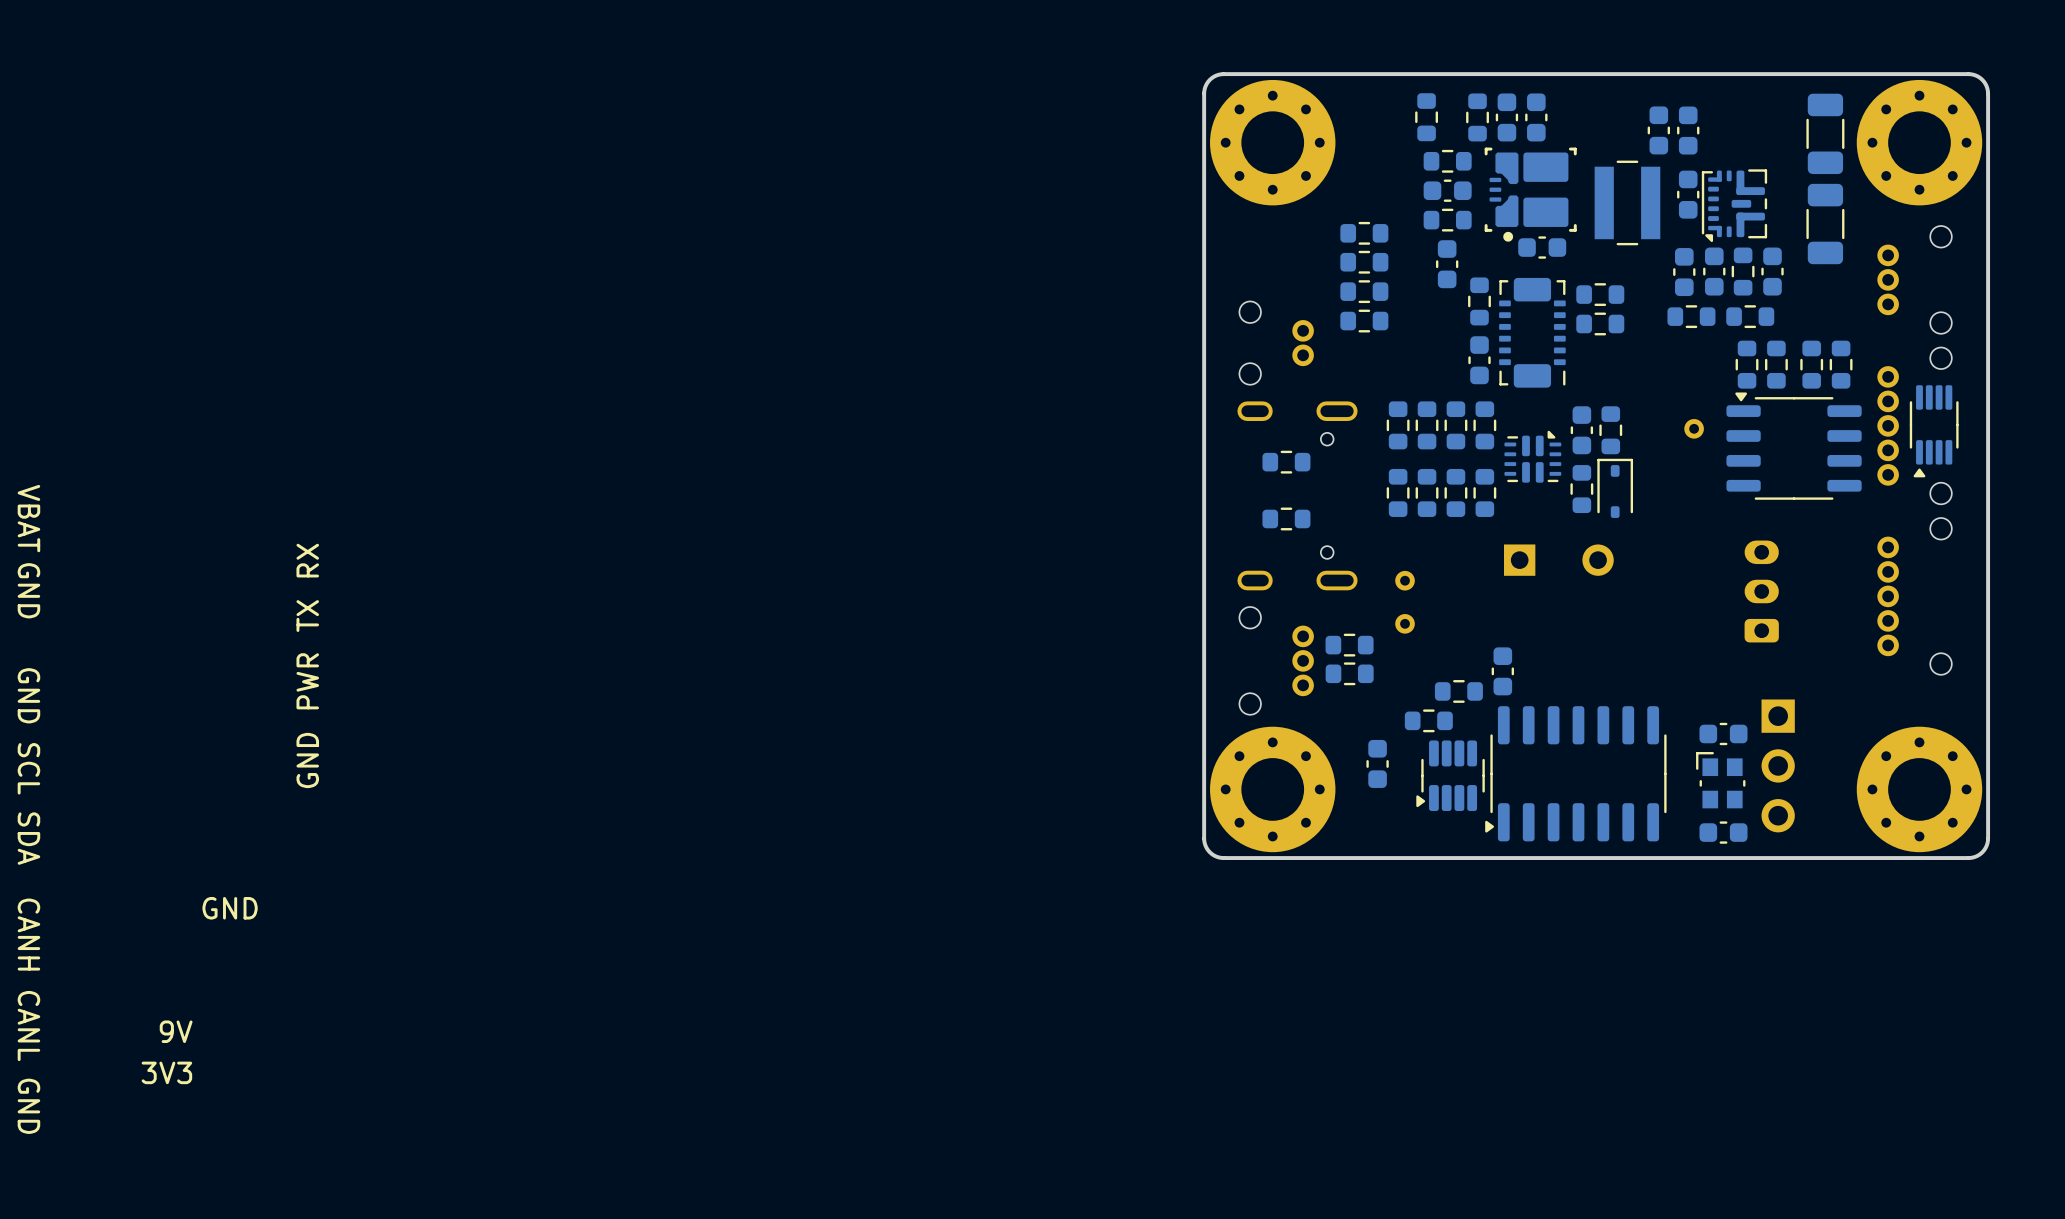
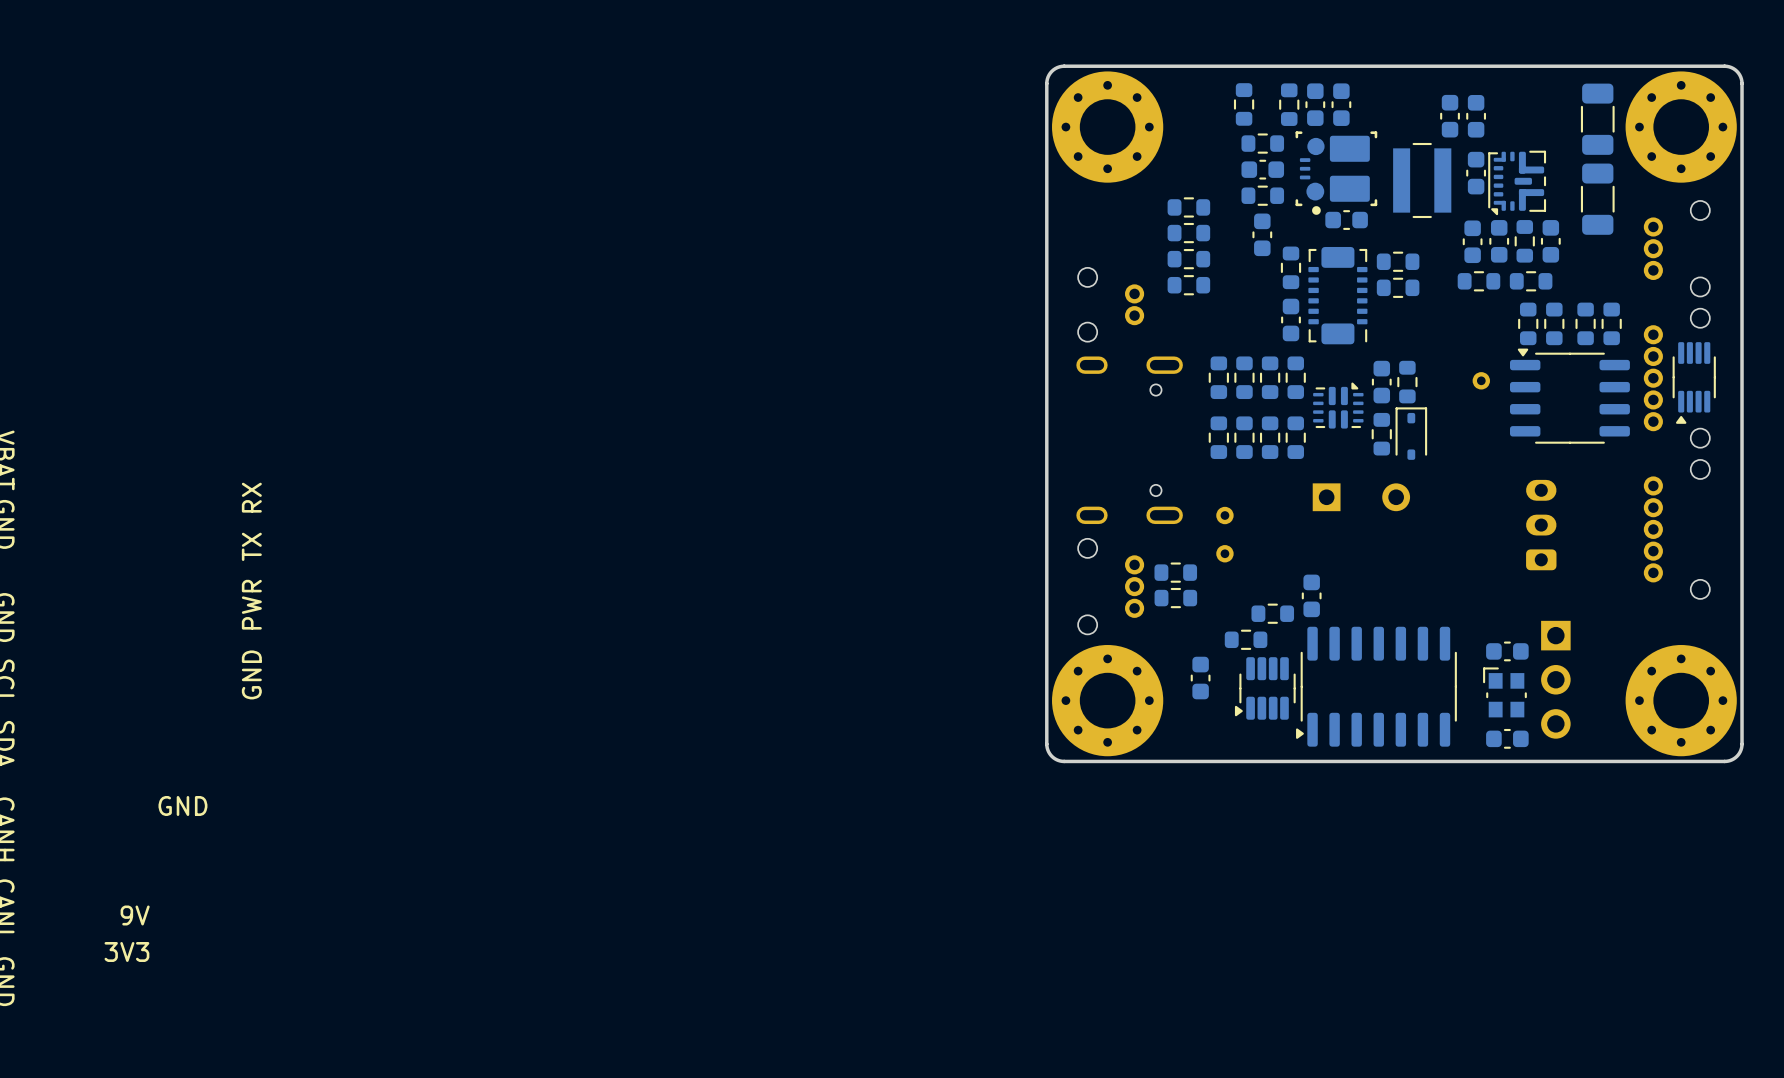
part footprint: [1484, 147, 1577, 242] -> [1295, 131, 1378, 215]
part: (1286, 462) -> none
part: (1286, 518) -> none

